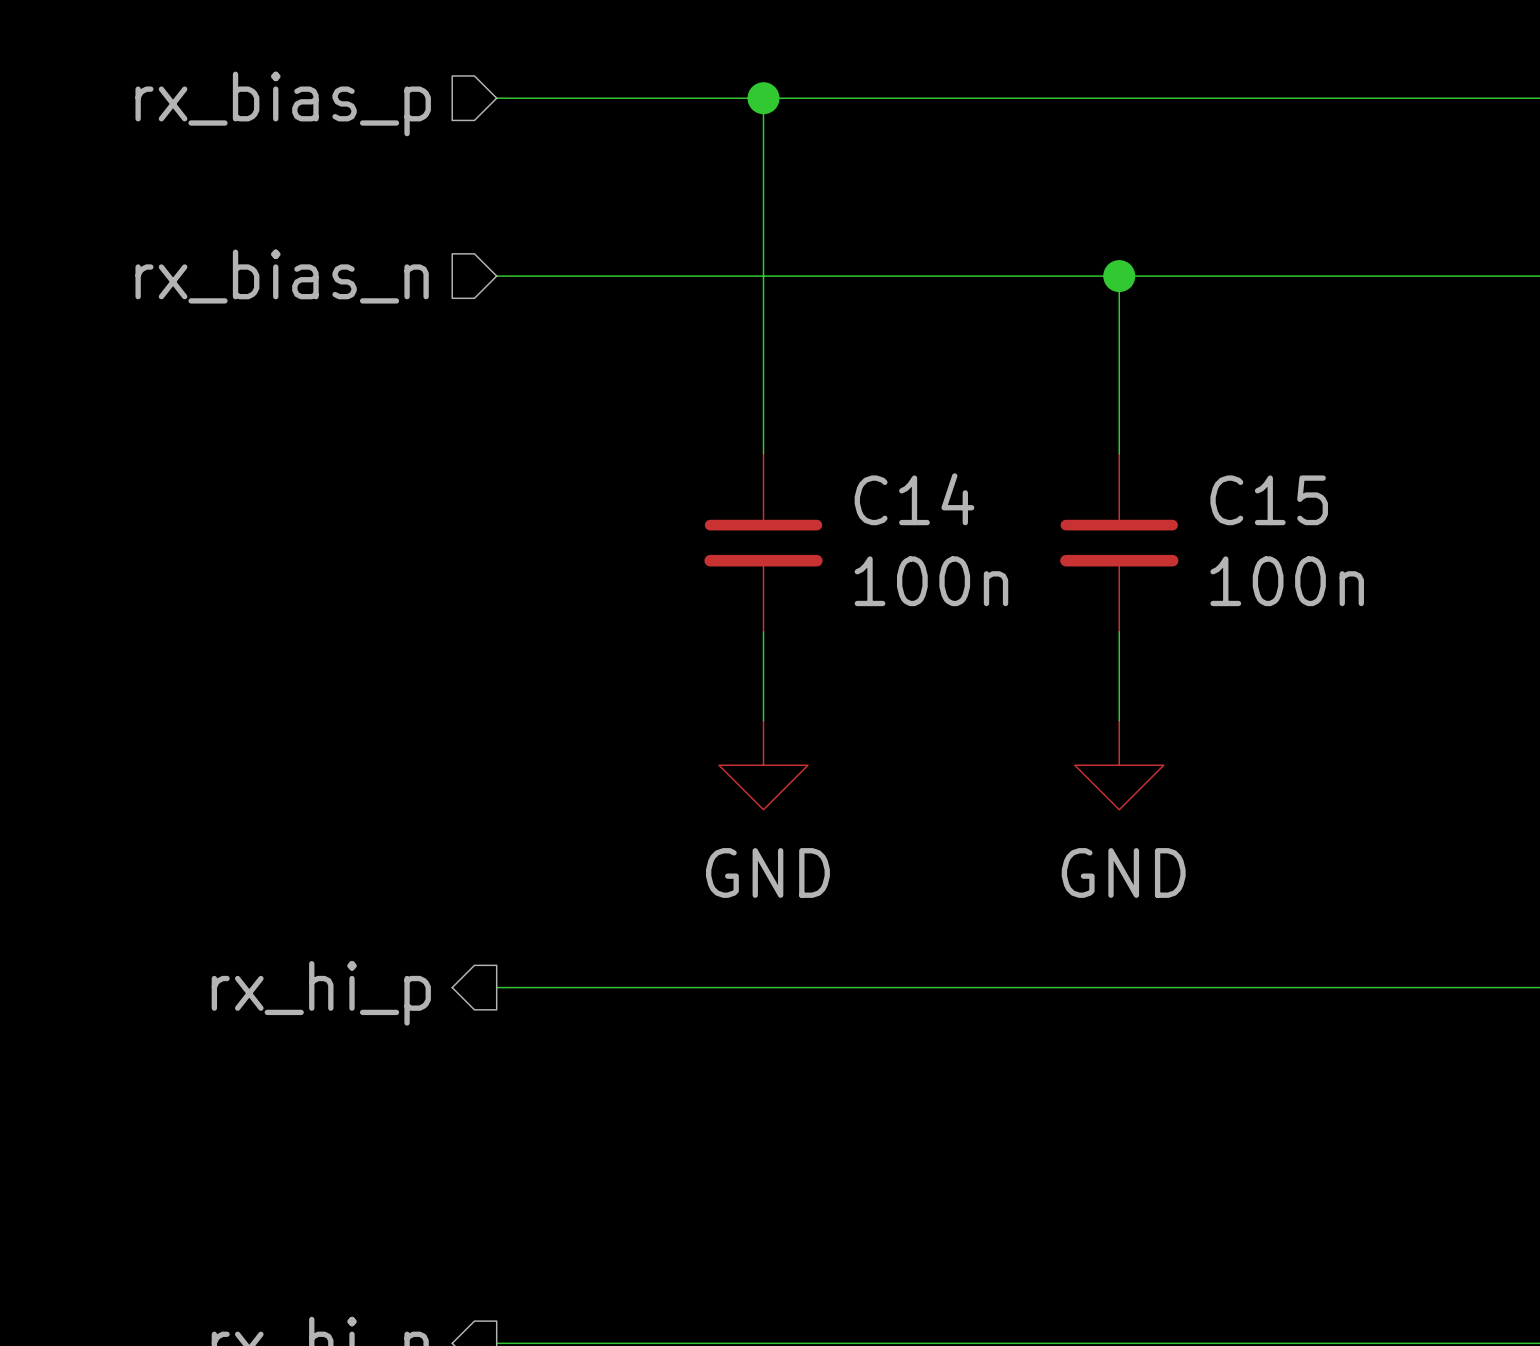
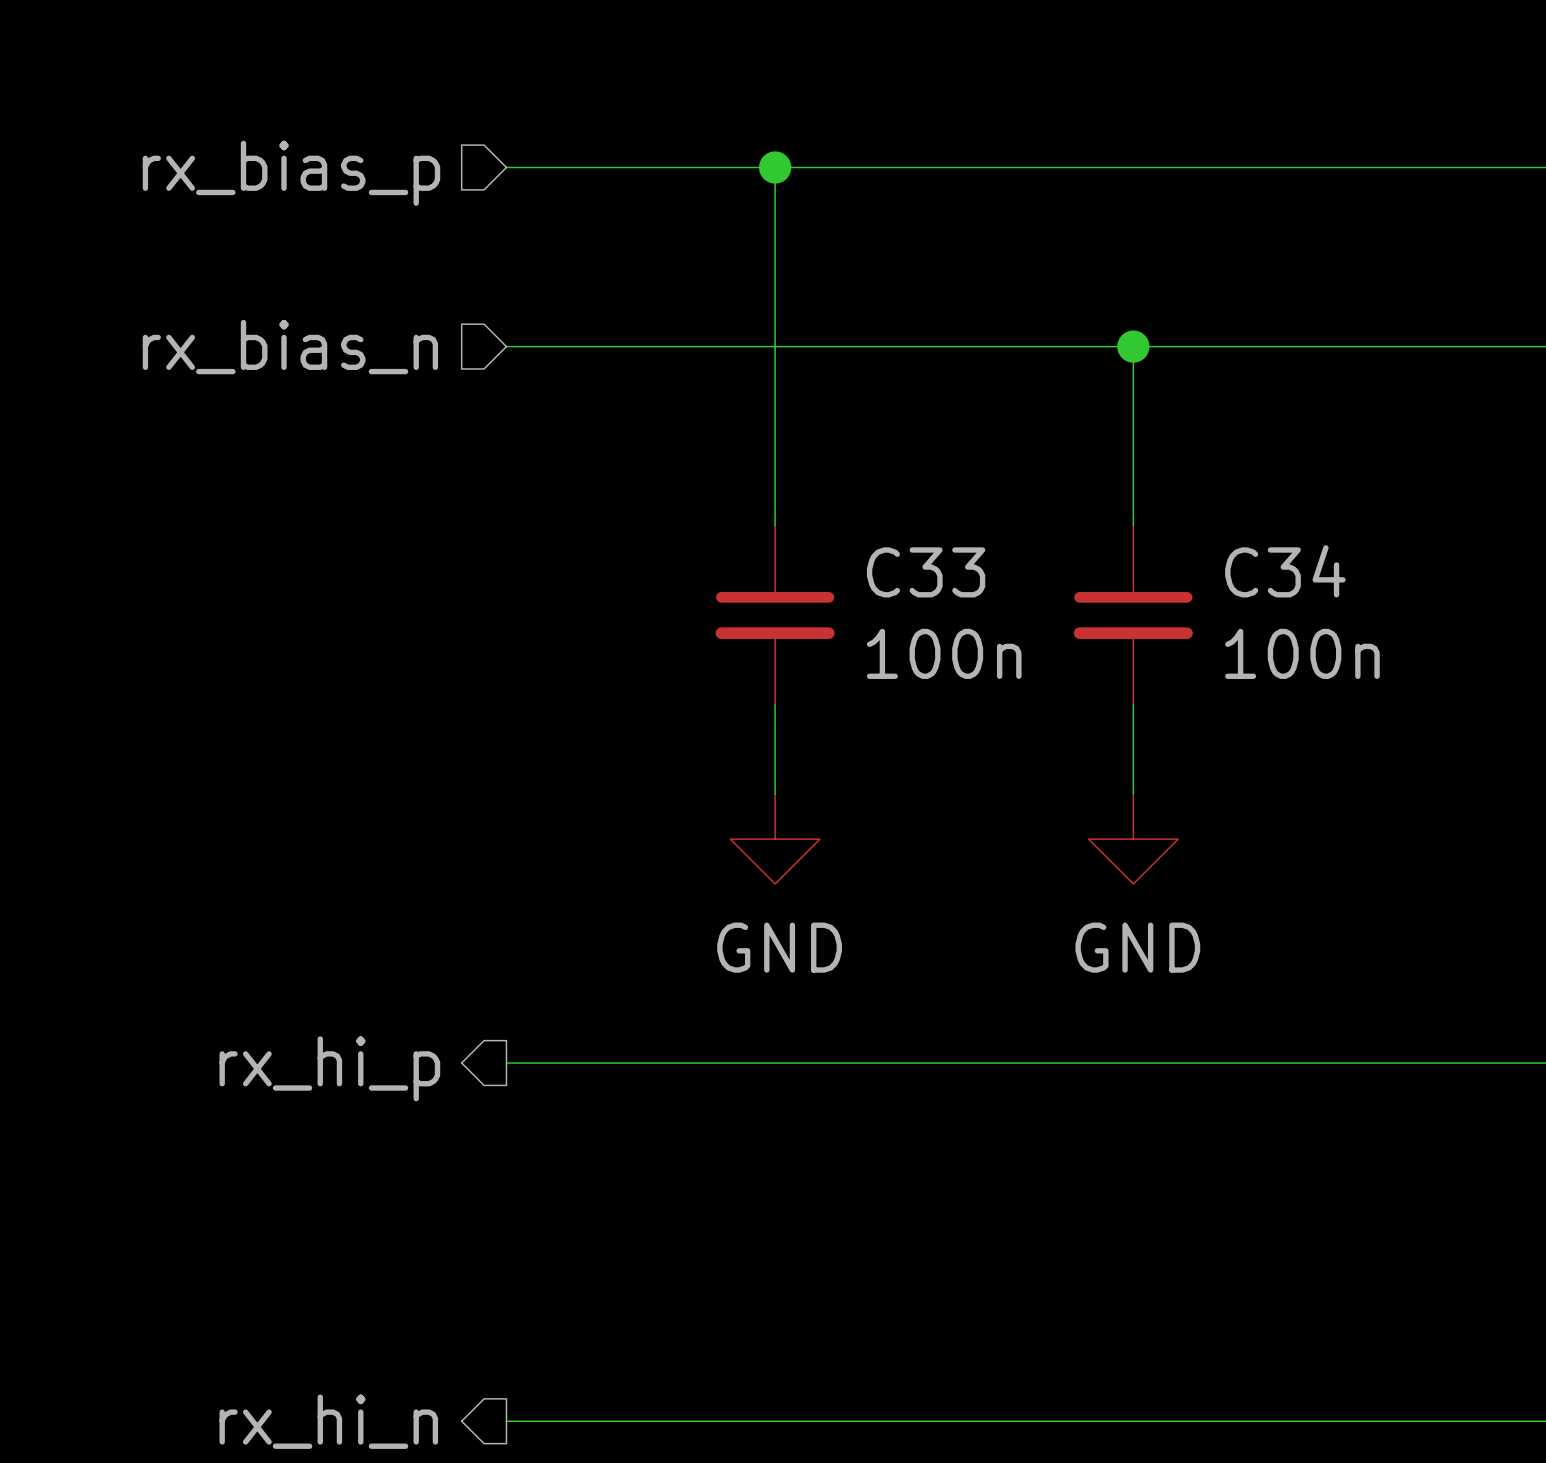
C14 name: C14 (914, 499) -> C33 (926, 572)
C15 name: C15 (1269, 500) -> C34 (1285, 571)

